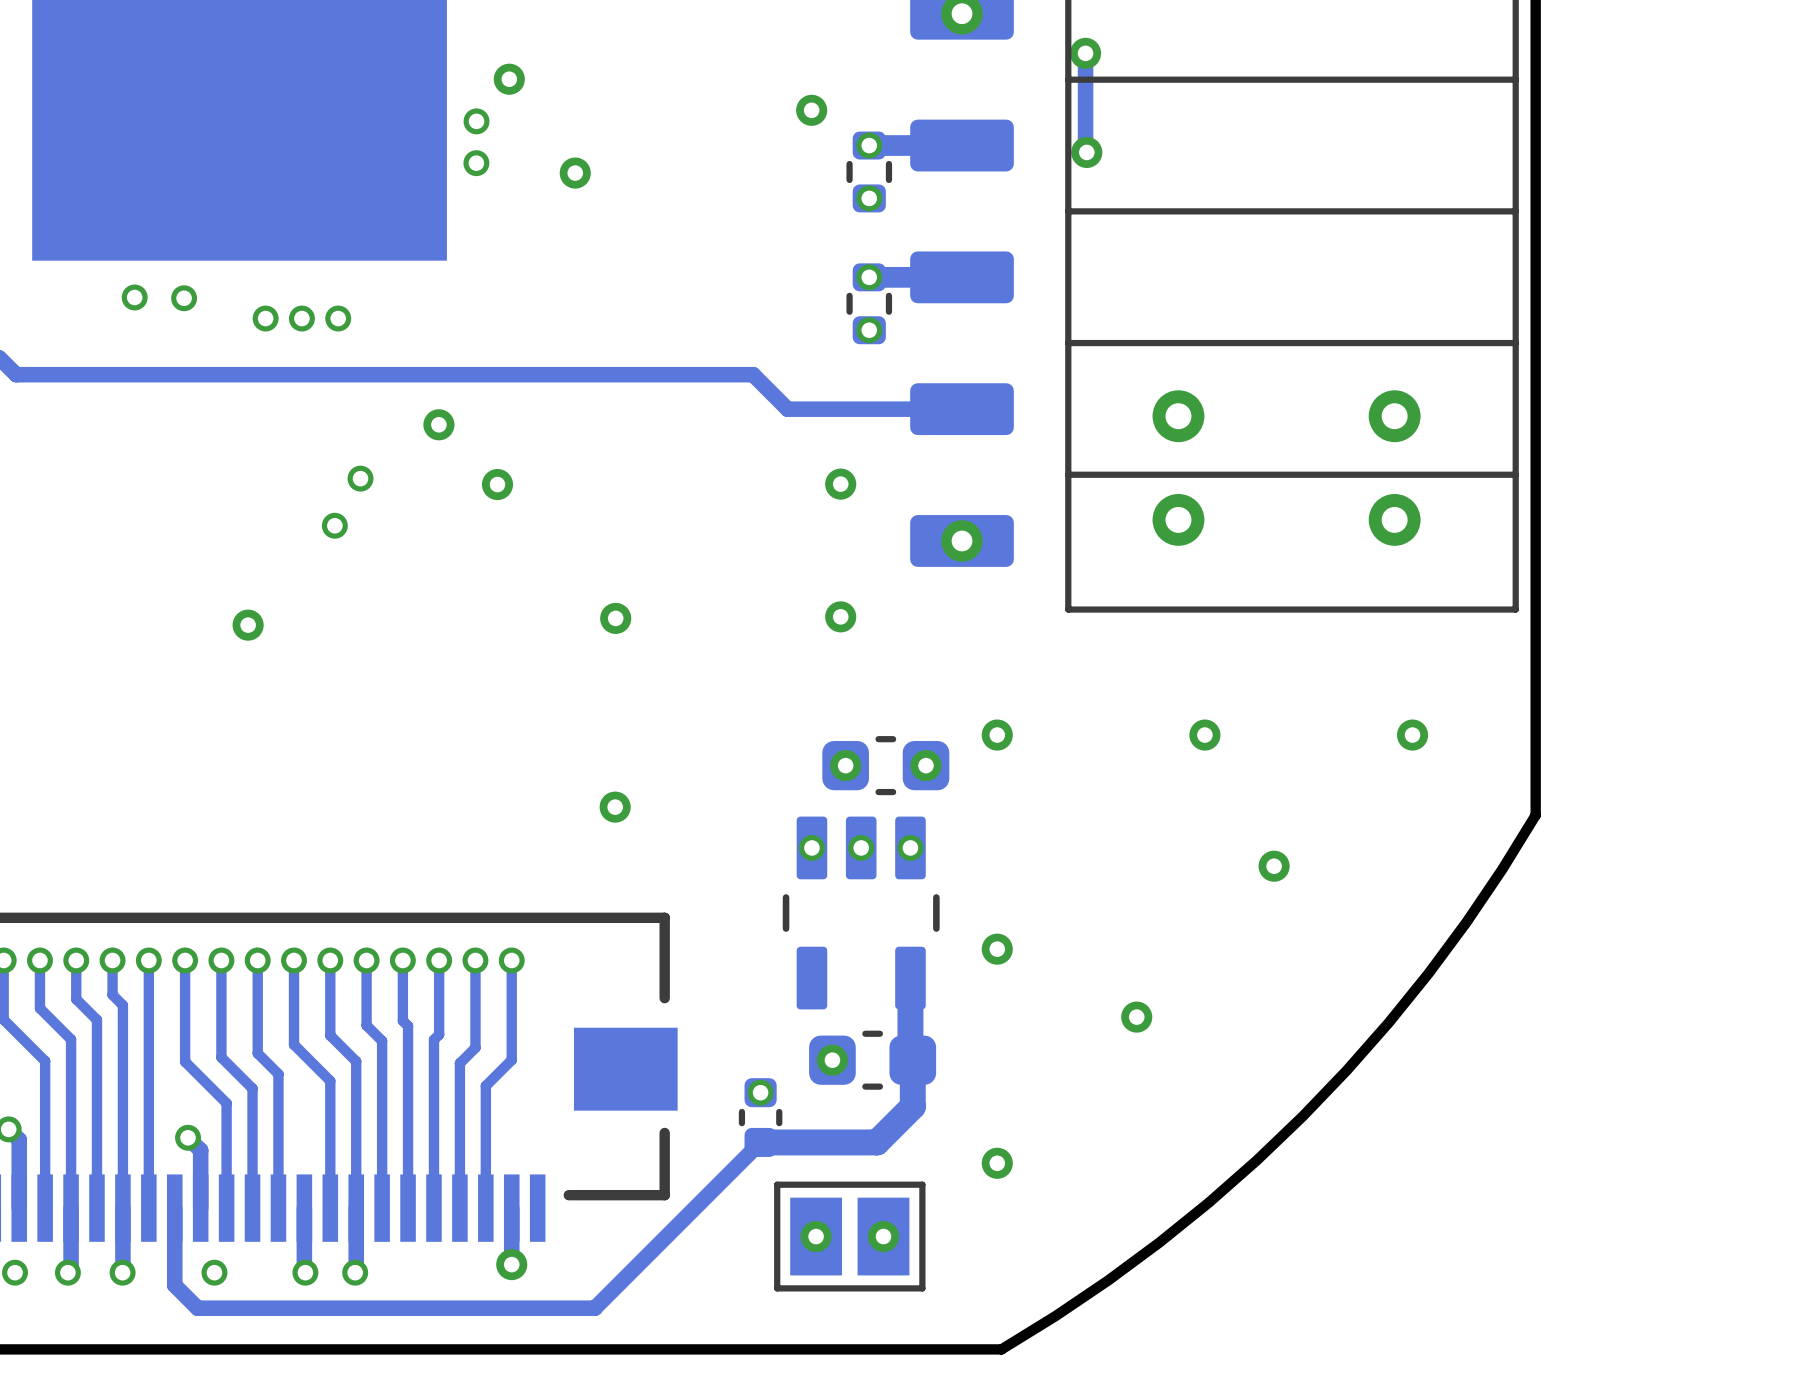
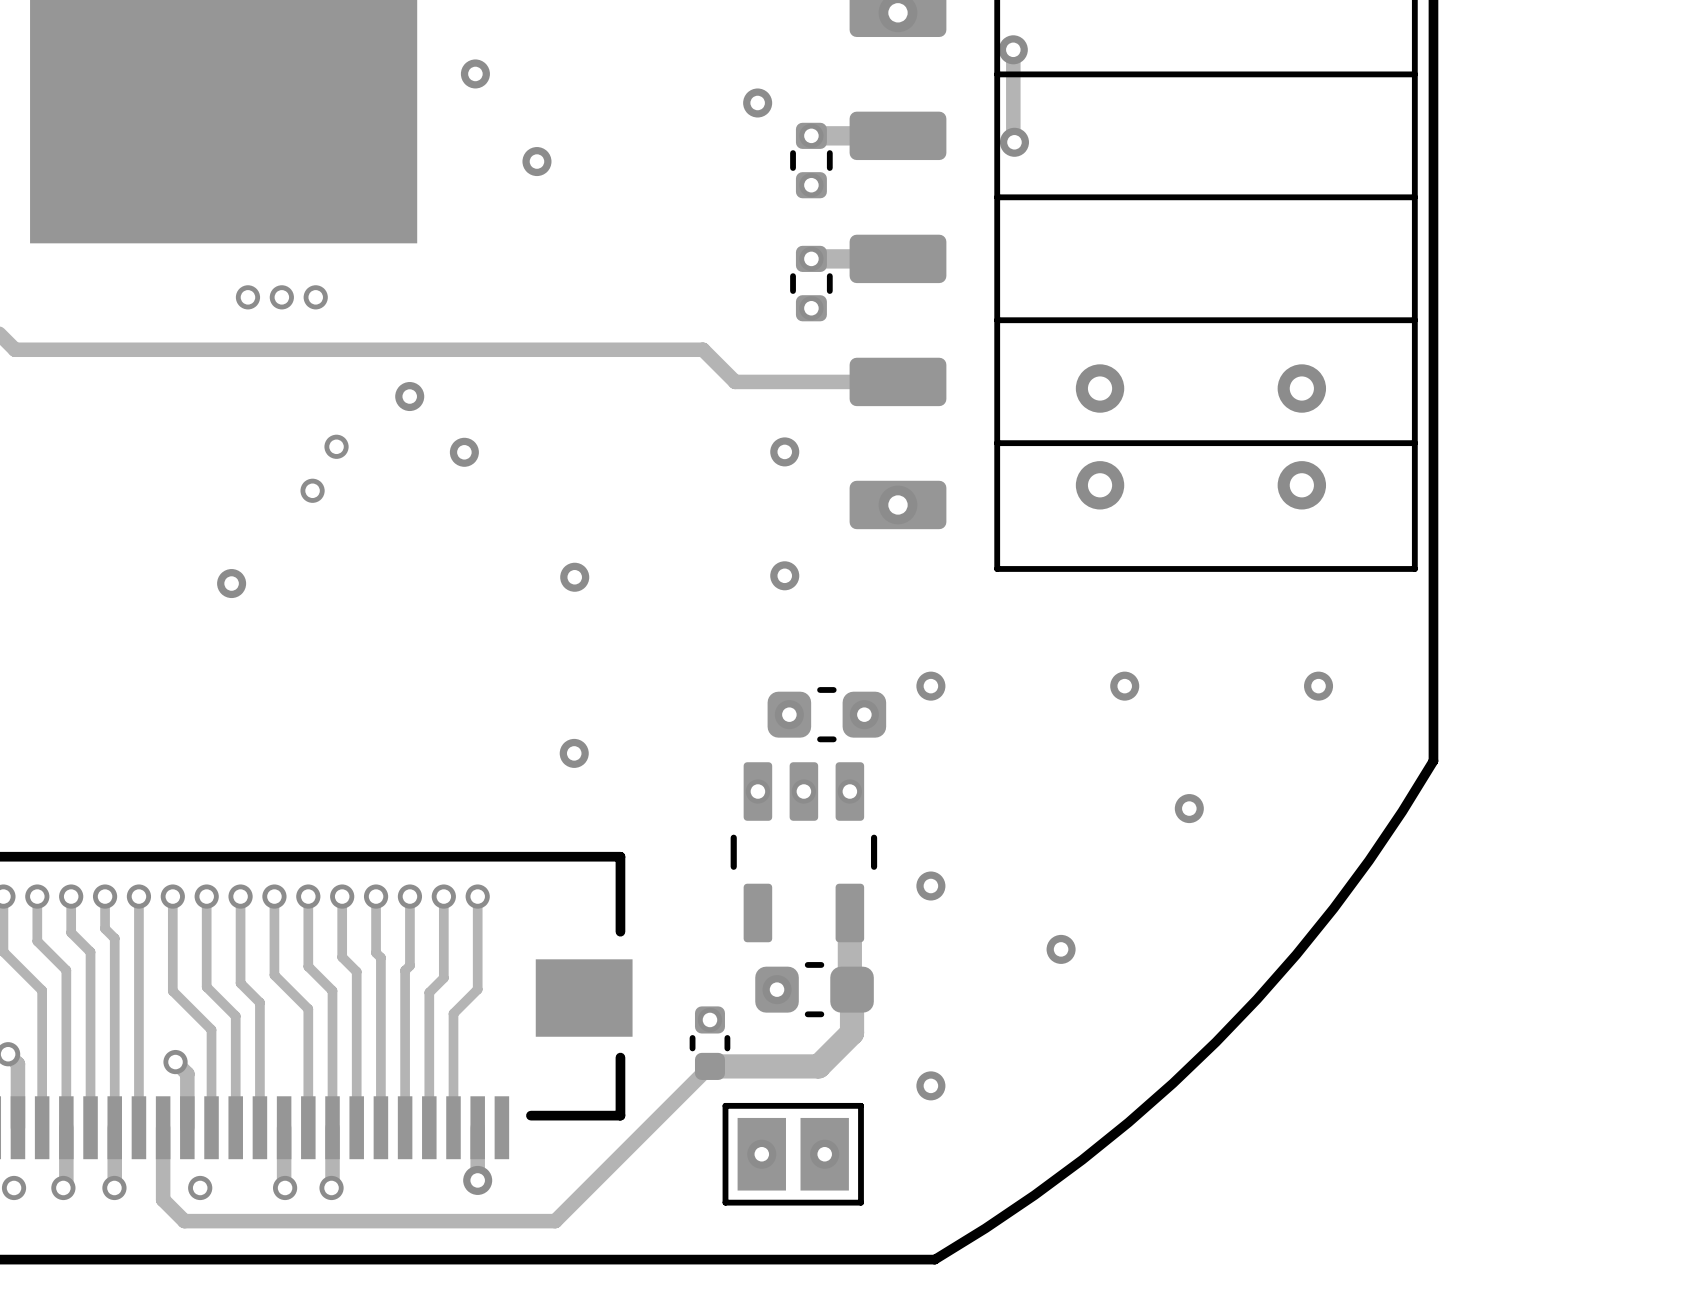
via: (476, 121) -> none
via: (476, 163) -> none
via: (134, 297) -> none
via: (184, 298) -> none

